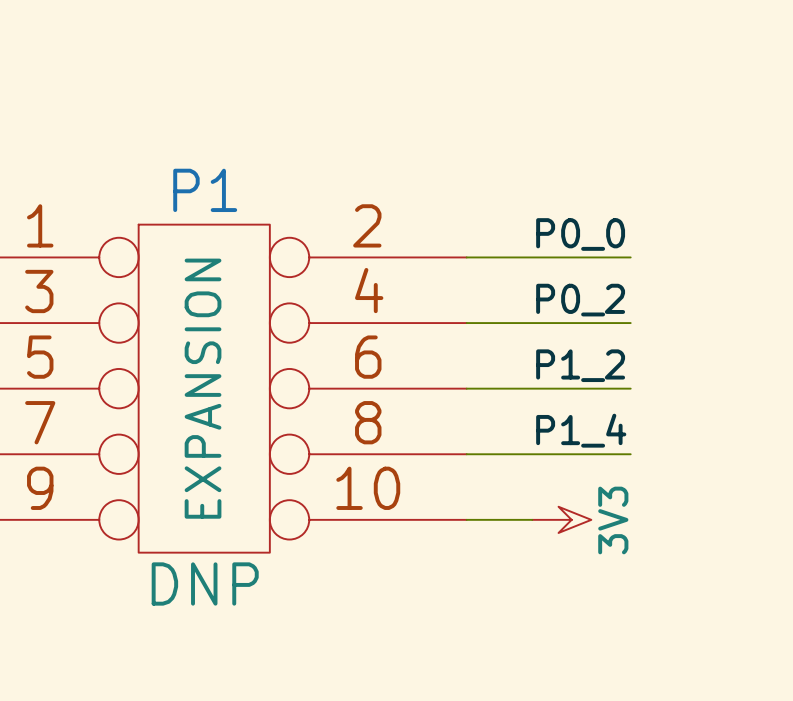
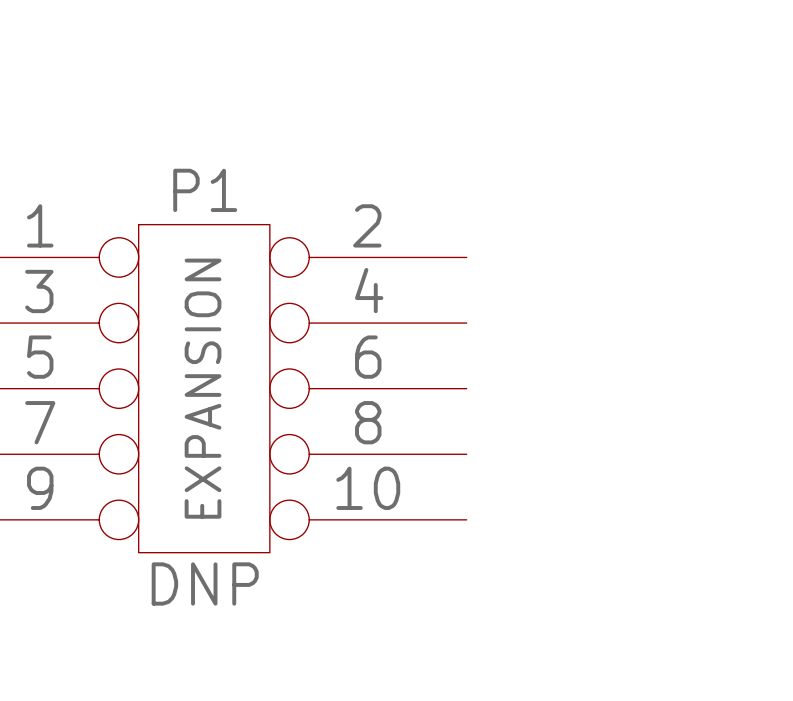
label: P0_0 (580, 234) -> none
wire: (466, 257) (630, 257) -> none
label: P0_2 (580, 300) -> none
wire: (466, 323) (630, 323) -> none
label: P1_2 (580, 365) -> none
wire: (466, 388) (630, 388) -> none
label: P1_4 (581, 430) -> none
wire: (466, 454) (630, 454) -> none
wire: (466, 519) (532, 519) -> none
power symbol: 3V3 (561, 519) -> none

